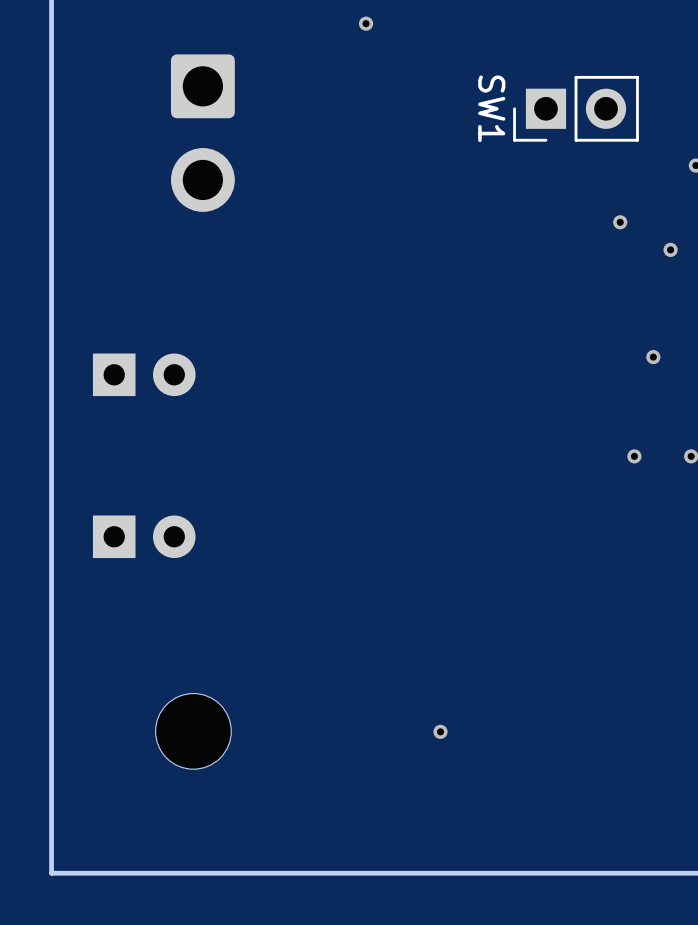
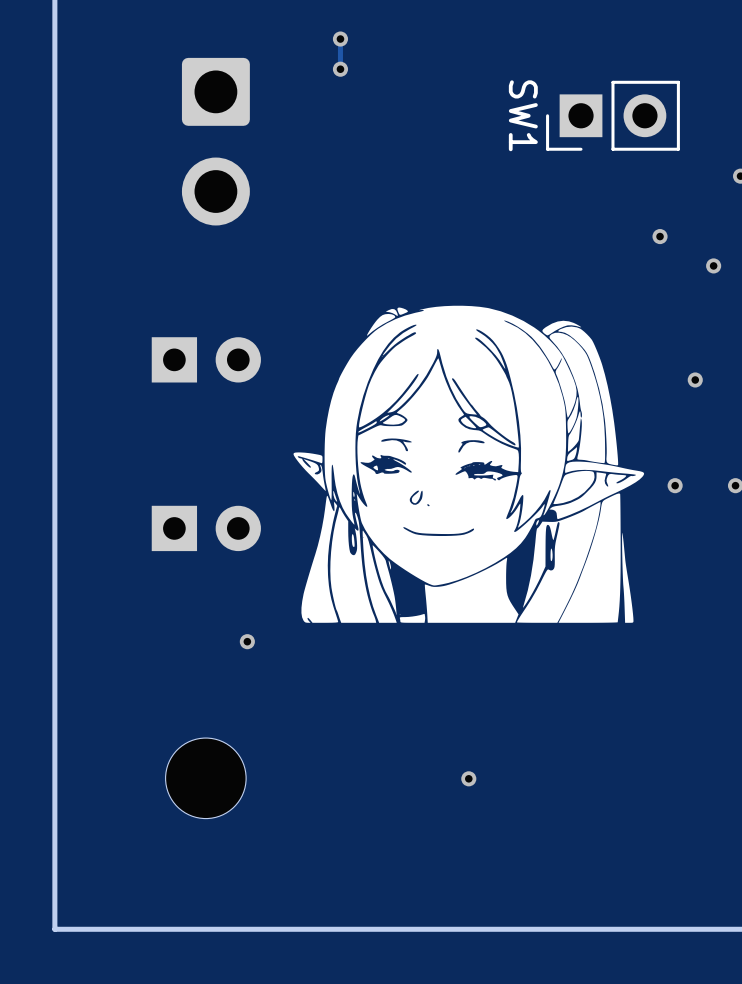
via: (366, 23) -> none
track: none -> (340, 39) (340, 69)
via: none -> (340, 39)
via: none -> (340, 69)
drawing: none -> [293, 305, 645, 623]
part position: (144, 374) -> (206, 359)
part position: (144, 536) -> (206, 528)
via: none -> (247, 641)

